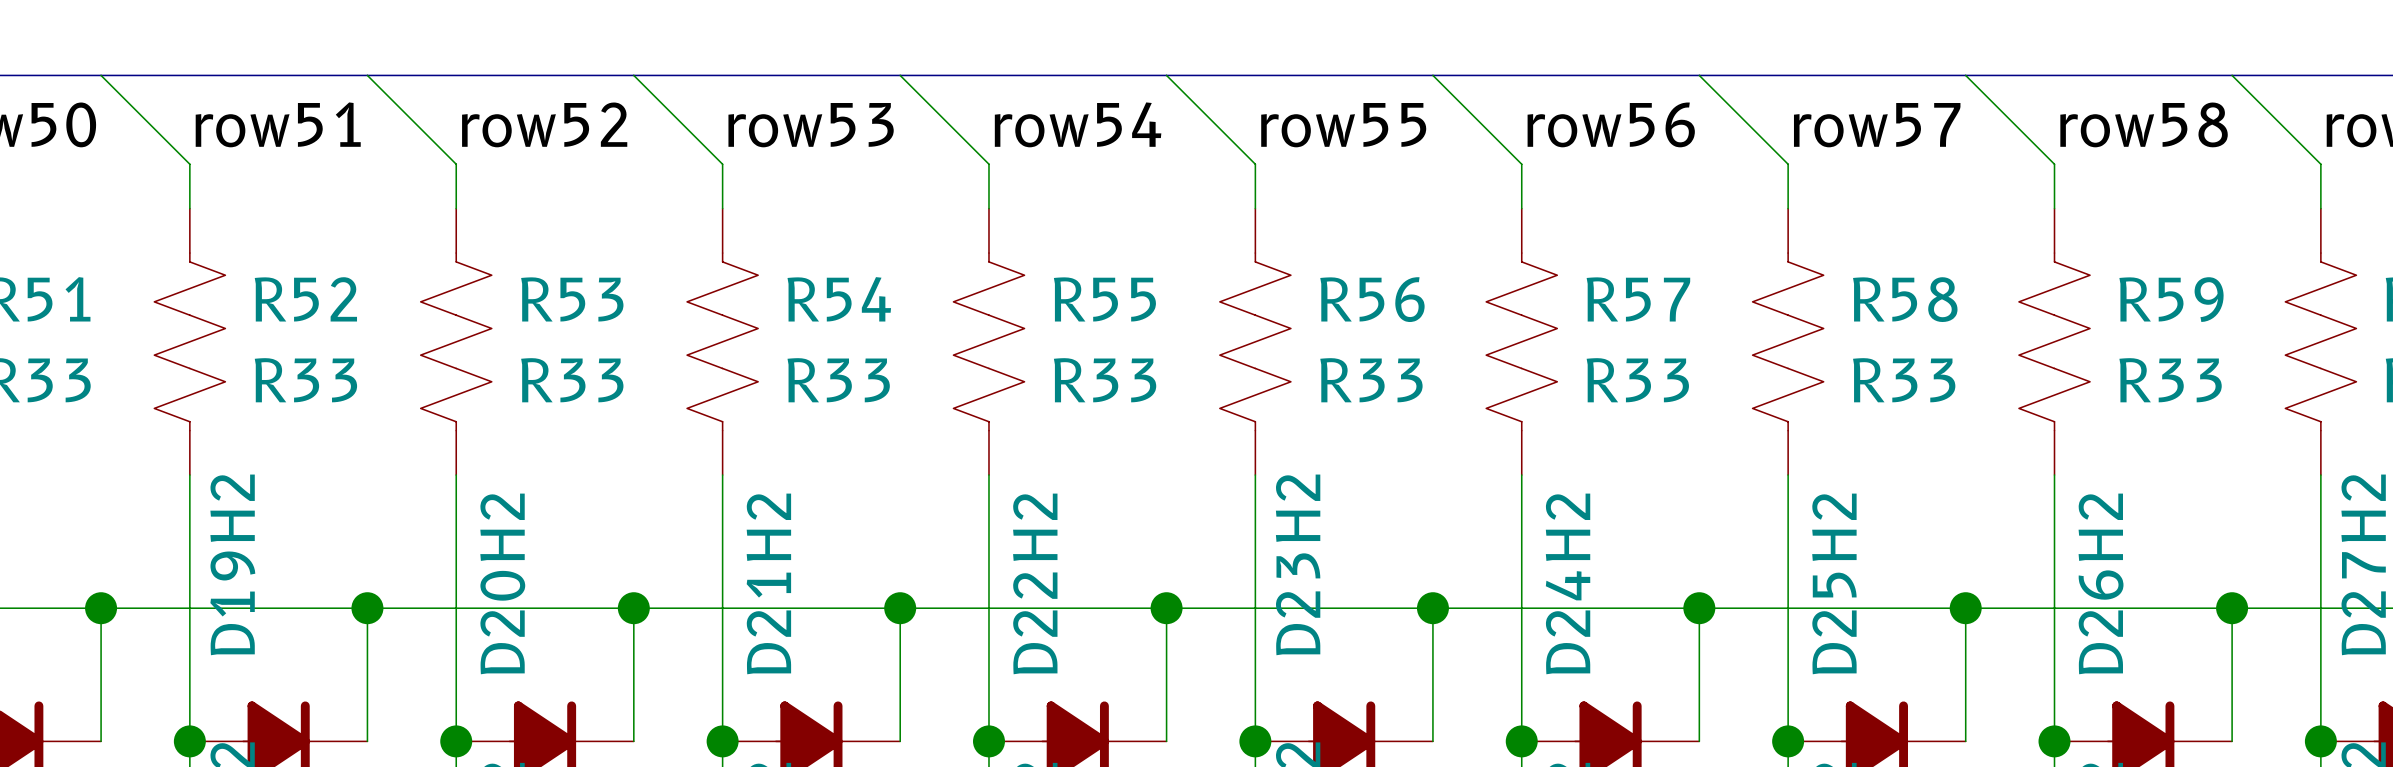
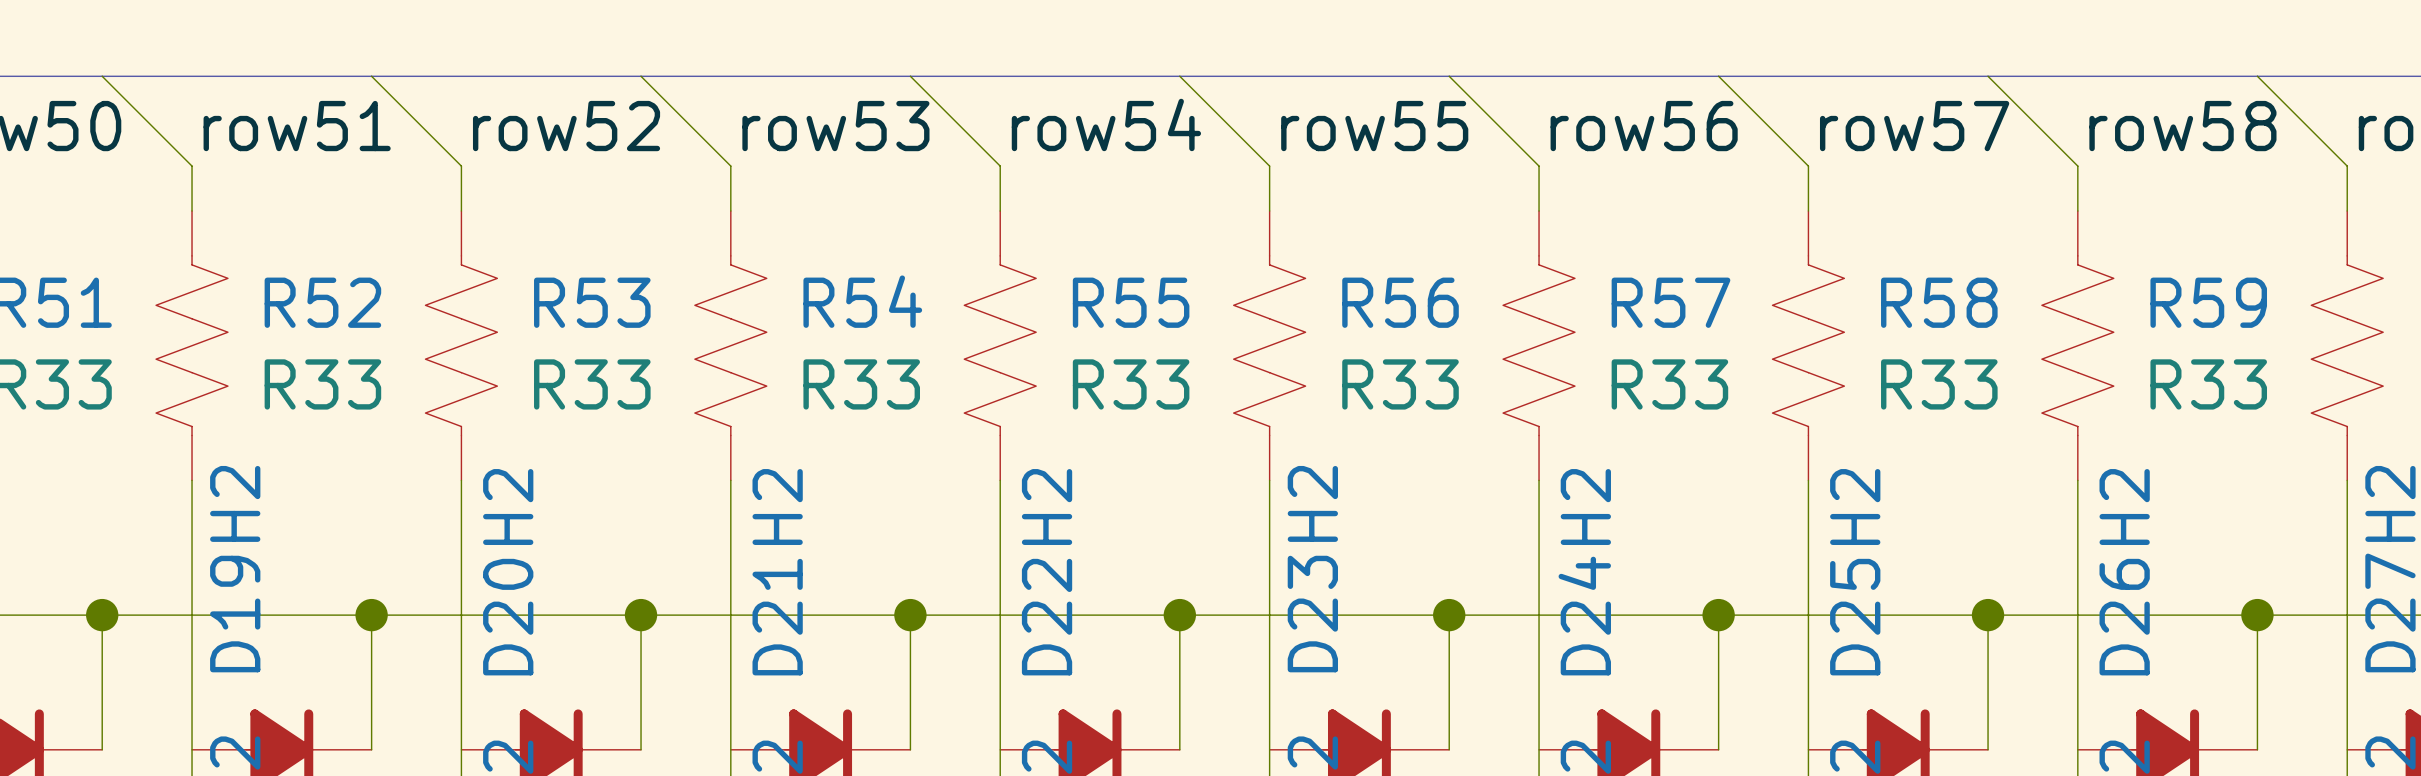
junction: (189, 741) -> none
junction: (456, 741) -> none
junction: (722, 741) -> none
junction: (988, 741) -> none
junction: (1255, 741) -> none
junction: (1521, 741) -> none
junction: (1788, 741) -> none
junction: (2054, 741) -> none
junction: (2320, 741) -> none

